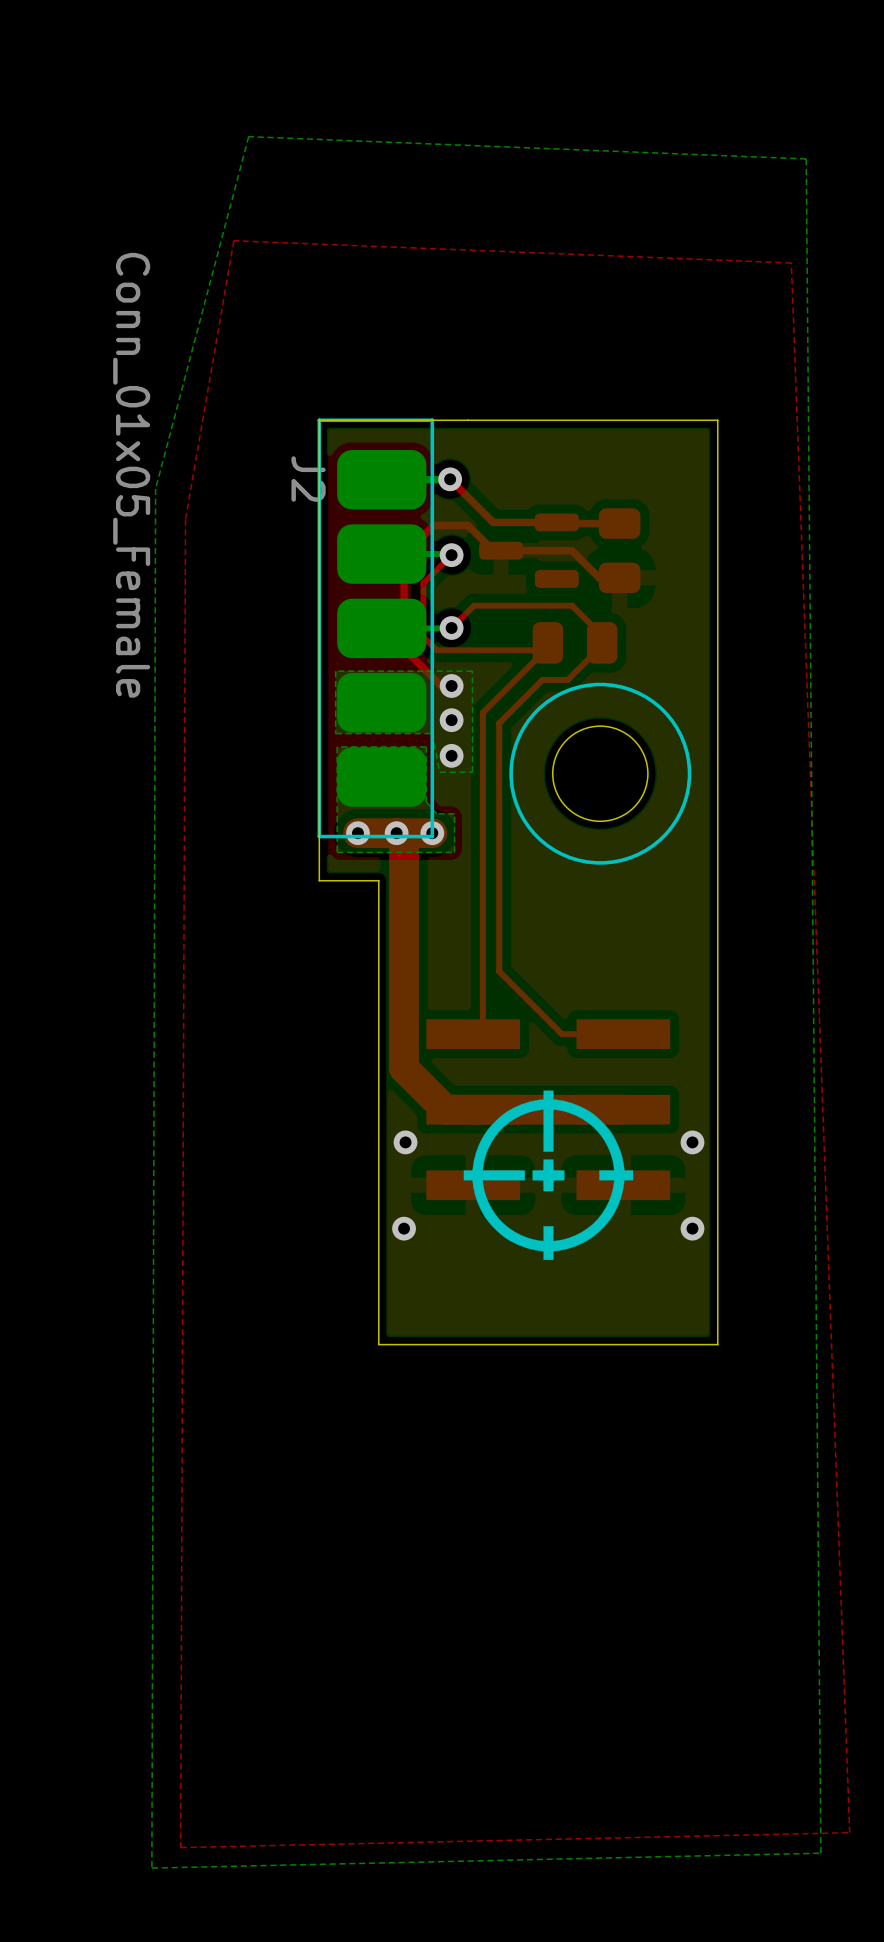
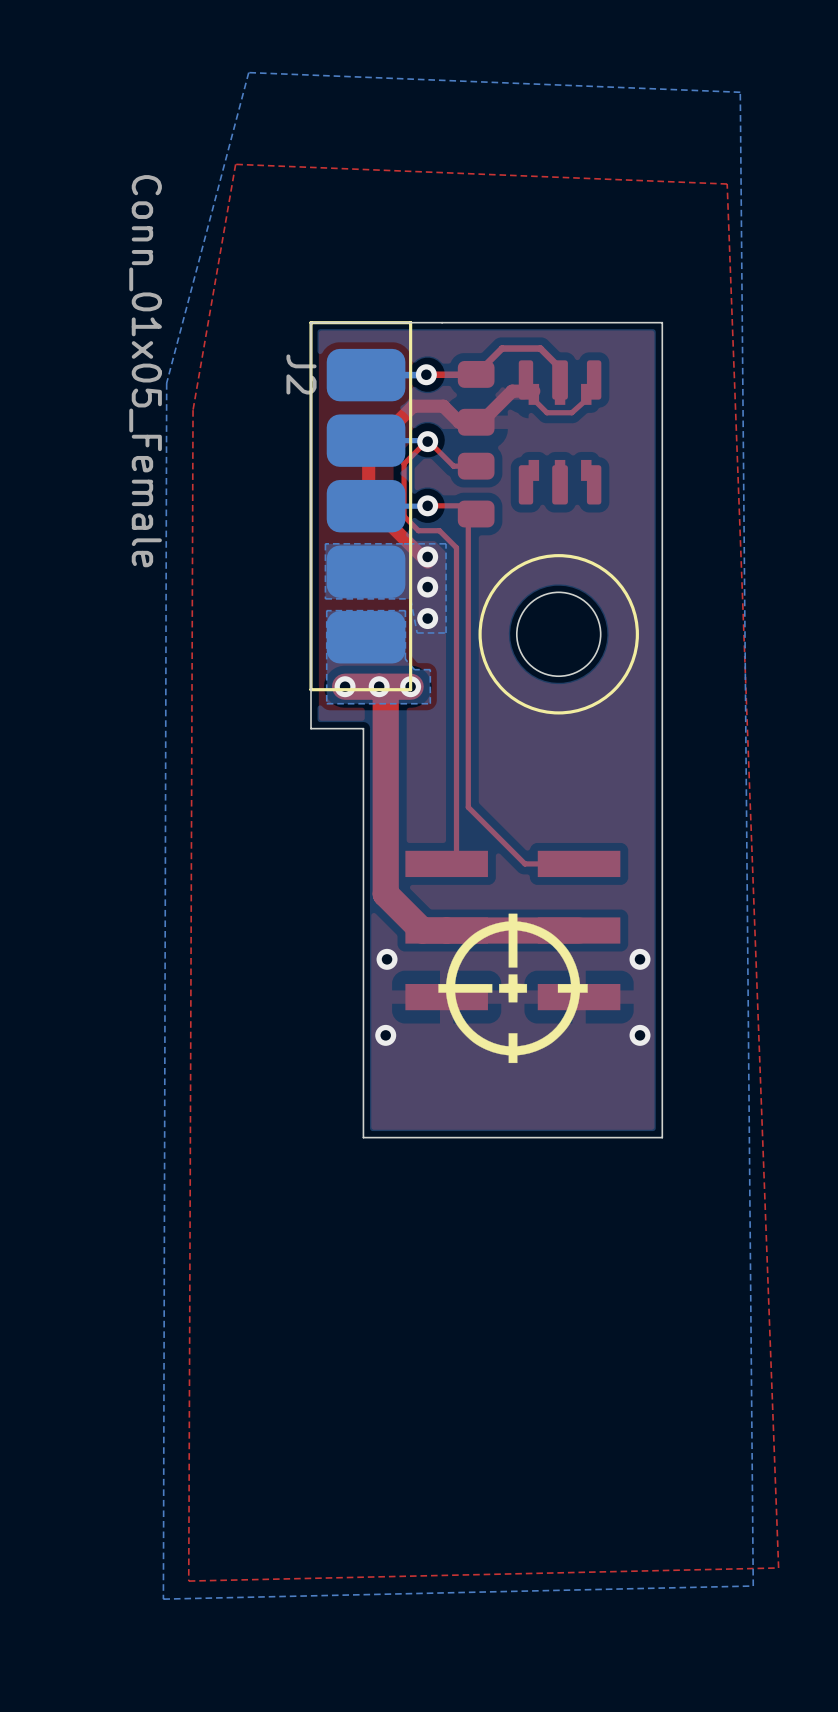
top track: (450, 479) (493, 522) (619, 523) -> none
top track: none -> (427, 374) (475, 374) (502, 348) (540, 348) (560, 368) (560, 394)
top track: none -> (533, 391) (512, 391) (481, 422) (459, 422) (443, 406) (413, 406) (368, 450) (368, 503) (427, 562)
part: none -> (476, 398)
part footprint: [598, 508, 641, 594] -> [518, 360, 602, 505]
part: (528, 550) -> none
top track: (451, 555) (423, 583) (423, 636) (436, 650) (540, 650) (547, 642) (547, 647) (482, 712) (482, 1024) -> (476, 466) (453, 466) (427, 440) (404, 463) (404, 516) (418, 530) (439, 530) (456, 547) (455, 855)
top track: (619, 577) (599, 577) (572, 550) (493, 550) (467, 525) (433, 525) (404, 555) (404, 648) (441, 685) (451, 685) -> none
top track: (451, 628) (473, 605) (572, 605) (602, 635) (602, 645) (567, 680) (542, 680) (499, 723) (499, 971) -> (427, 505) (467, 505) (476, 514) (468, 521) (469, 808)
part rotation: 0° (575, 642) -> 90° clockwise (476, 490)
part position: (575, 642) -> (476, 490)

